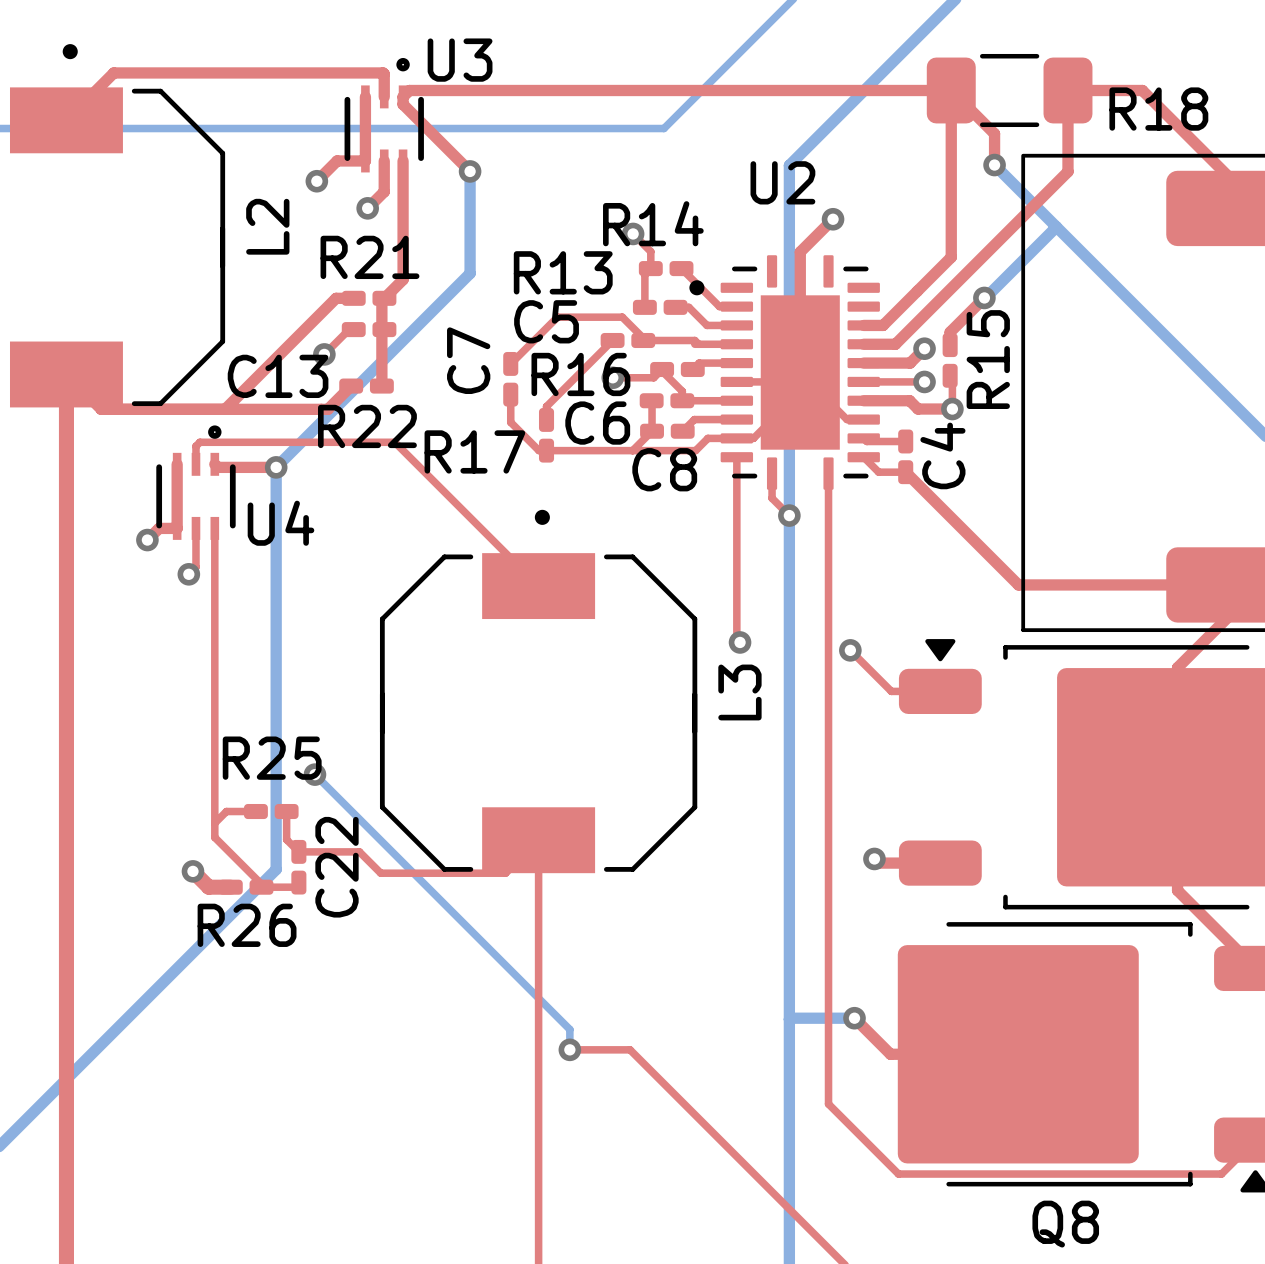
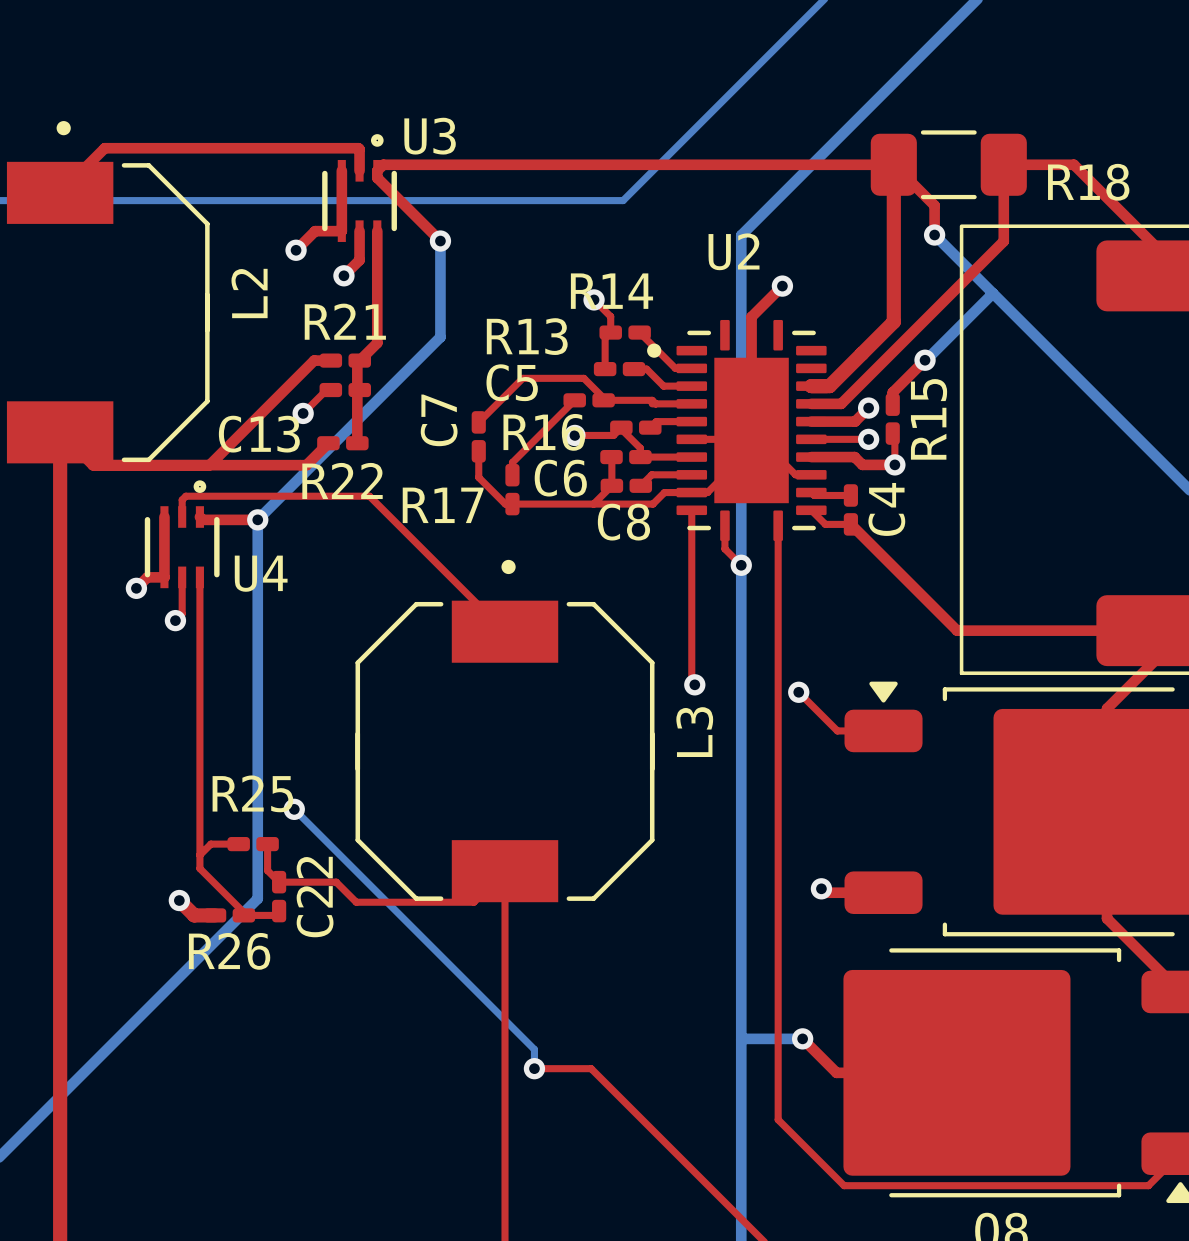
top track width: thin (951, 90) (951, 257) (883, 325) (863, 325) (880, 325) -> thick (893, 164) (893, 321) (829, 386) (811, 386) (827, 386)

